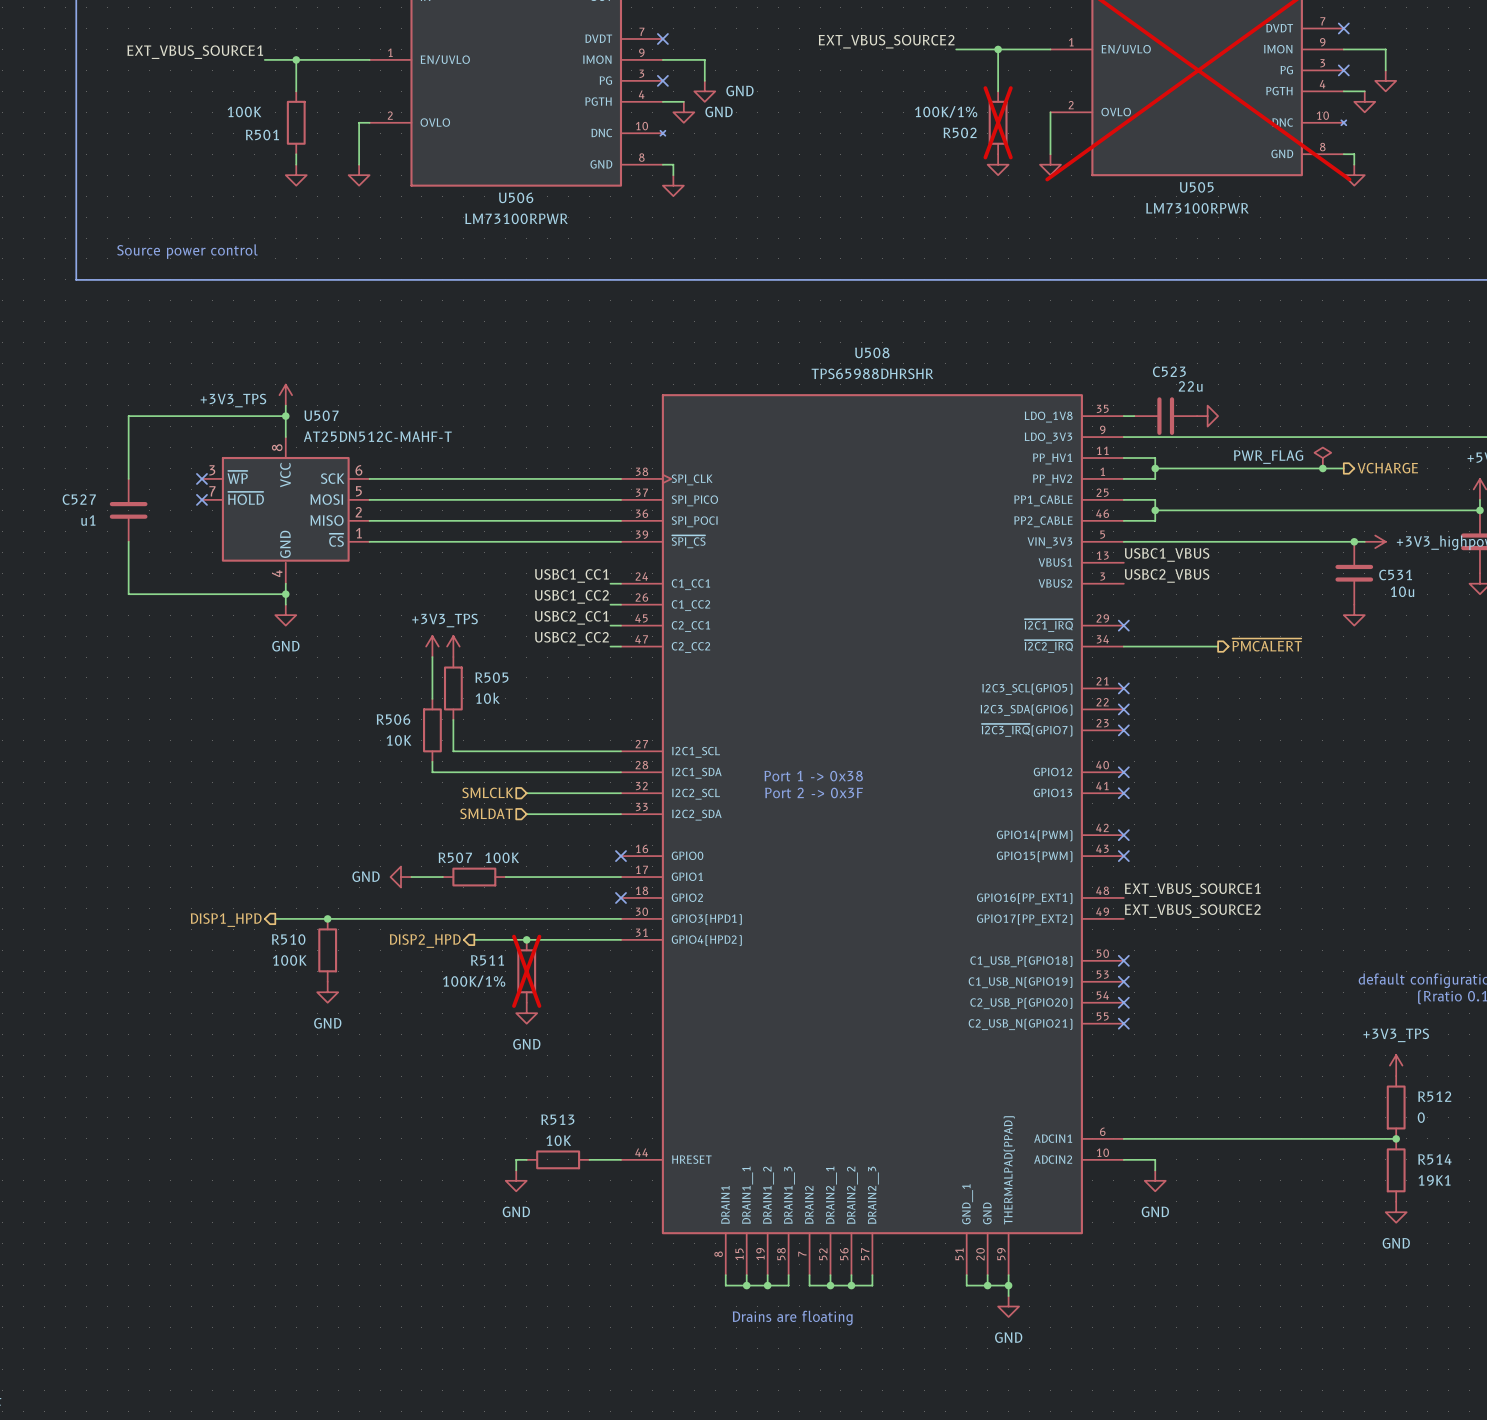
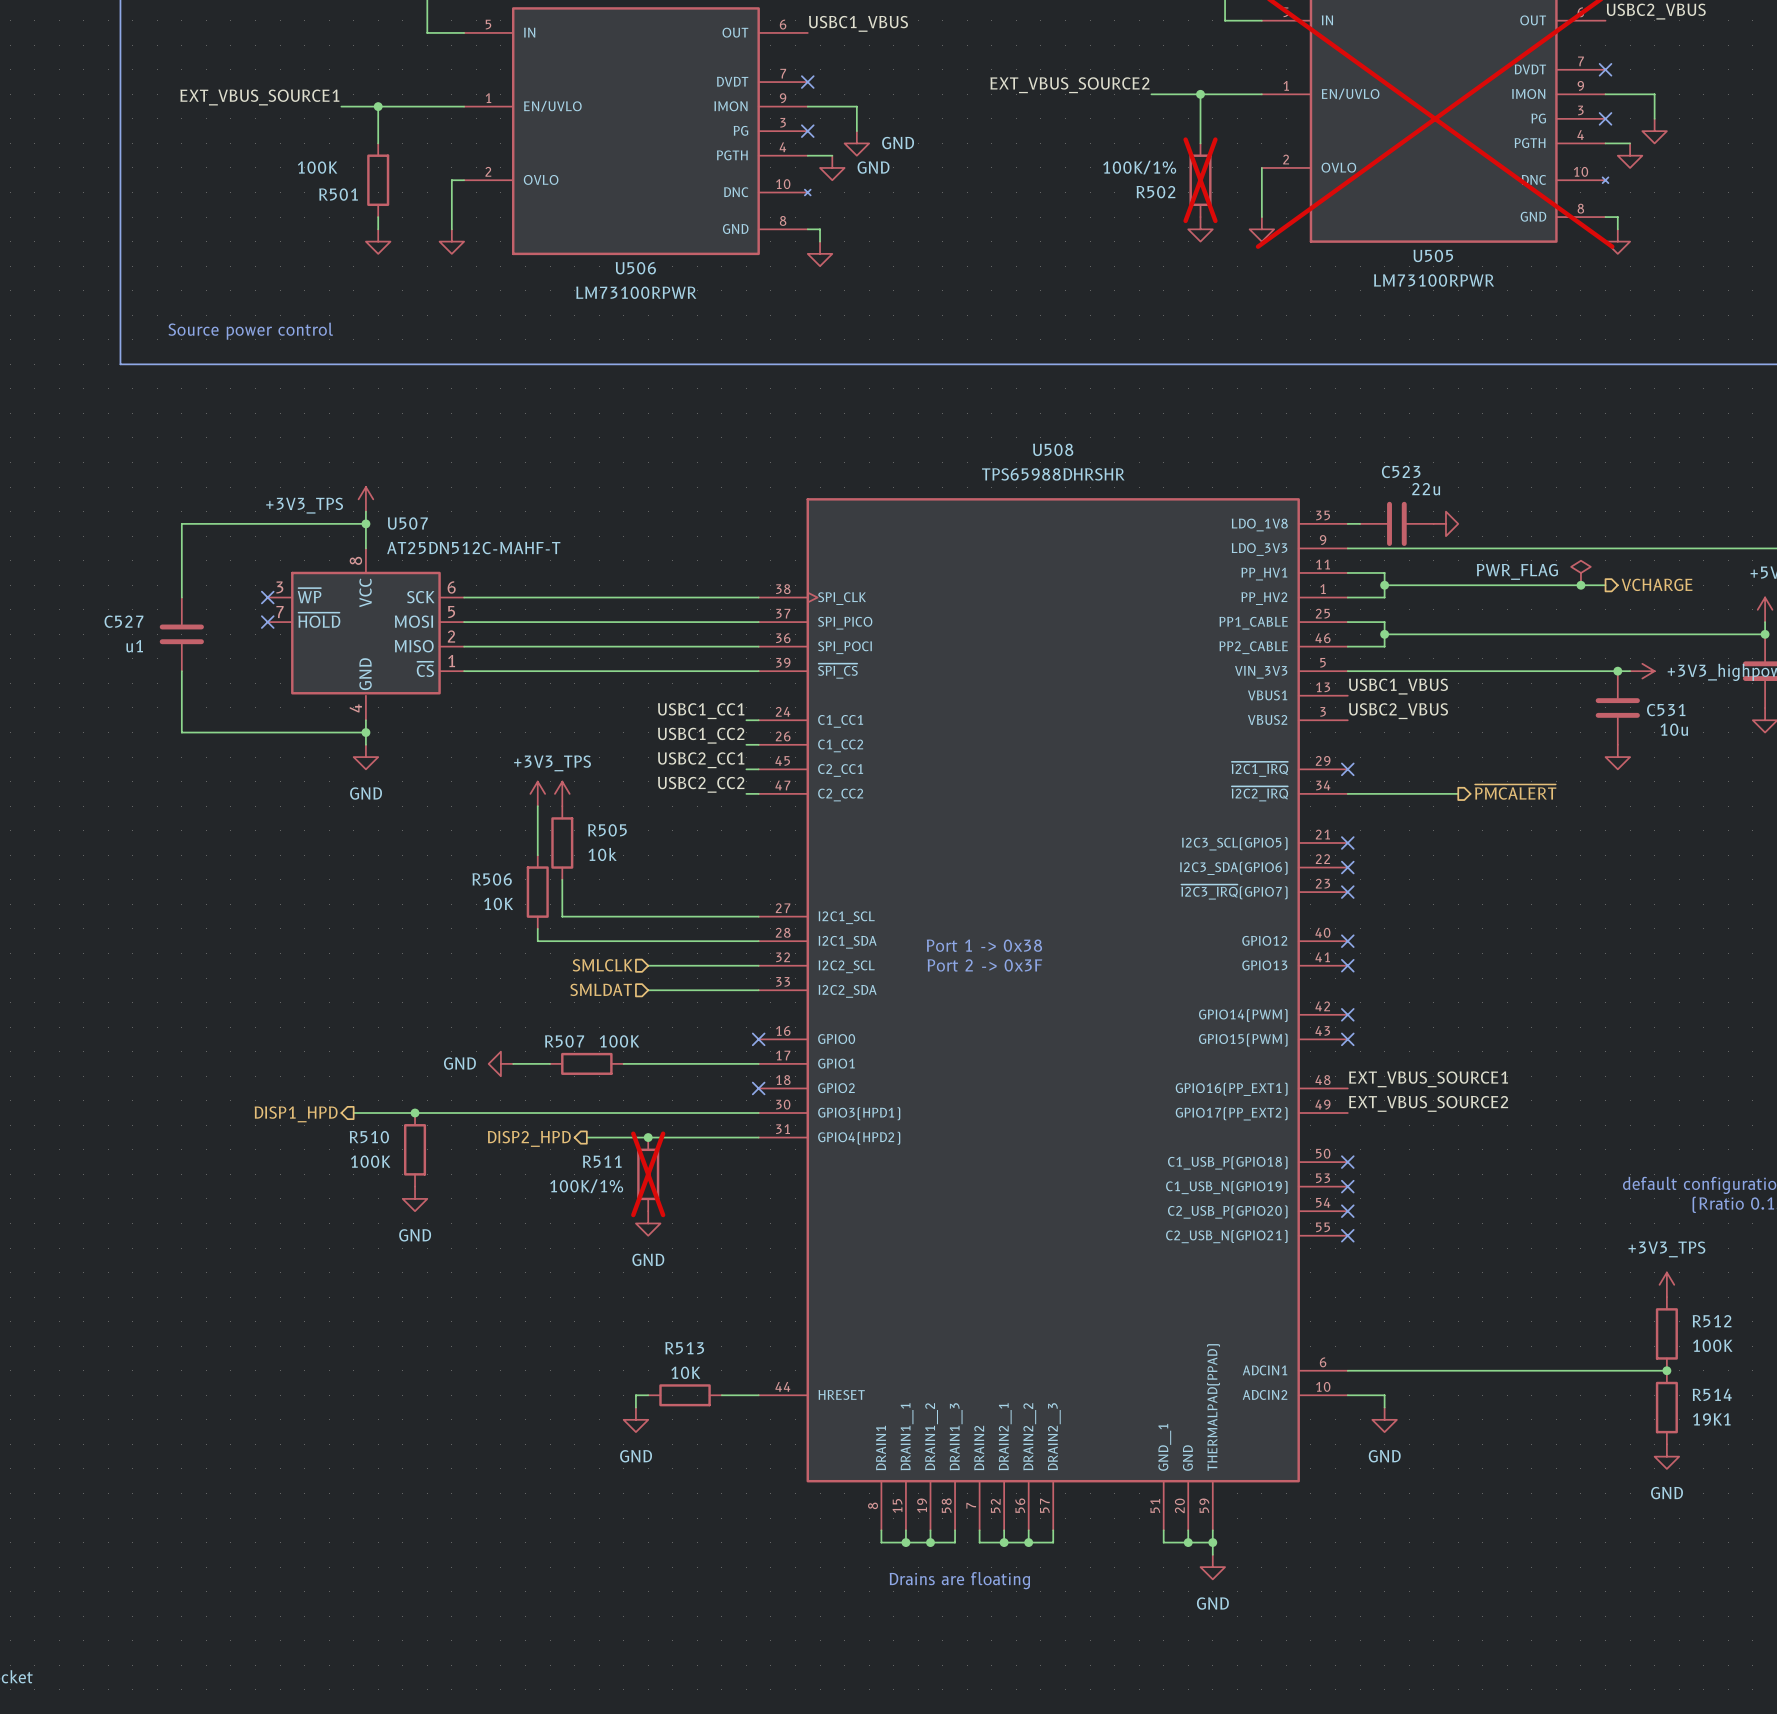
R512 value: 0 (1421, 1117) -> 100K (1712, 1345)

